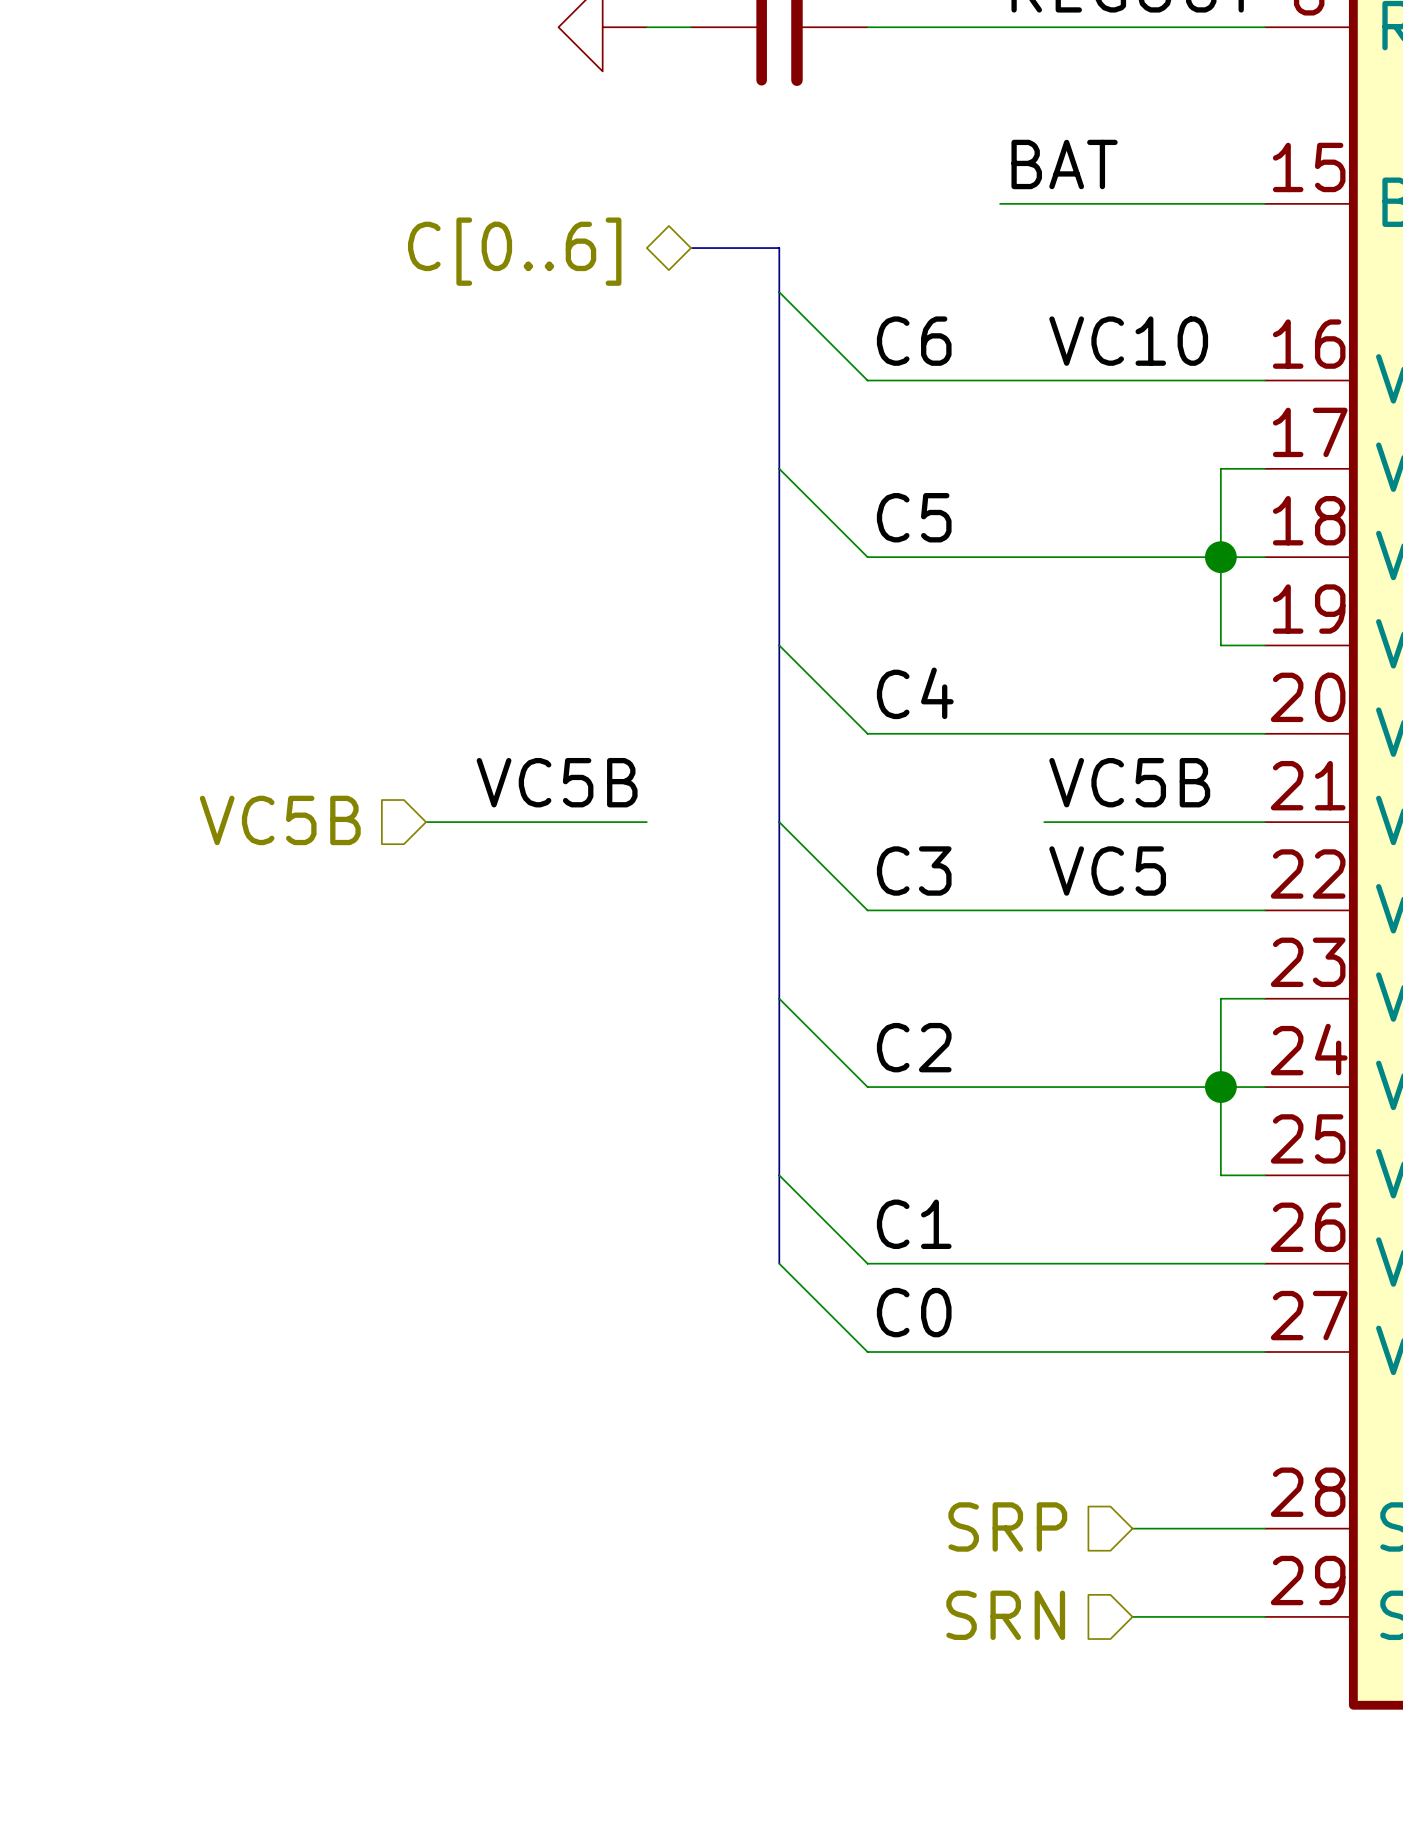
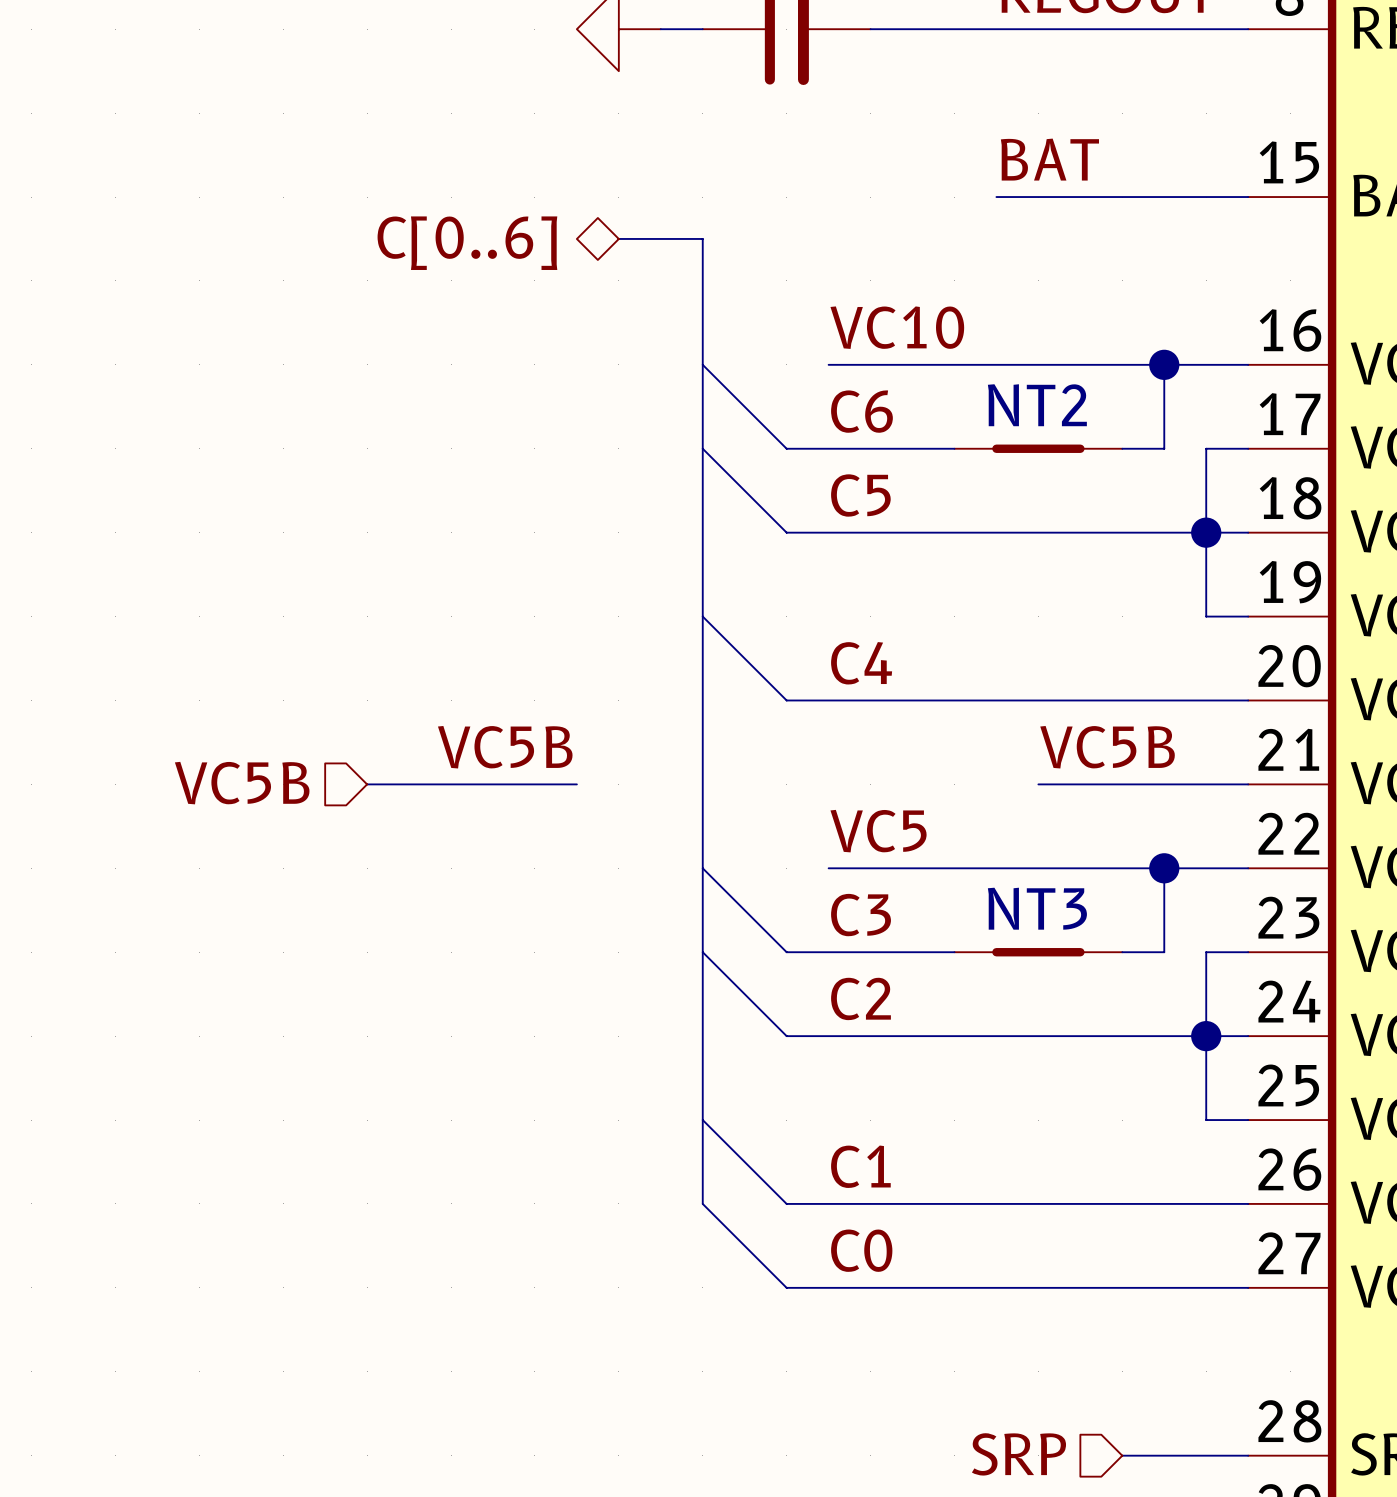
bus: (690, 248) (779, 248) (779, 1263) -> (618, 238) (702, 238) (702, 1203)
hierarchical label position: C[0..6] (514, 251) -> C[0..6] (467, 243)
wire: (779, 292) (867, 380) -> (828, 364) (870, 364)
label position: C6 (914, 341) -> C6 (861, 411)
label position: VC10 (1128, 341) -> VC10 (897, 327)
wire: none -> (702, 364) (786, 448) (954, 448)
wire: none -> (1164, 364) (1164, 448) (1122, 448)
junction: none -> (1164, 364)
wire: (779, 468) (867, 557) -> (702, 448) (786, 532) (870, 532)
NT2: none -> (1038, 448)
label position: C5 (914, 517) -> C5 (860, 495)
wire: (779, 645) (867, 733) -> (702, 616) (786, 700) (870, 700)
label position: C4 (915, 693) -> C4 (861, 663)
label position: VC5B (557, 782) -> VC5B (505, 747)
hierarchical label position: VC5B (280, 820) -> VC5B (242, 783)
wire: (558, 822) (646, 822) -> (367, 784) (451, 784)
wire: (779, 822) (867, 910) -> (828, 868) (870, 868)
label position: C3 (914, 871) -> C3 (861, 915)
label position: VC5 (1107, 871) -> VC5 (878, 831)
wire: none -> (702, 868) (786, 952) (954, 952)
wire: none -> (1164, 868) (1164, 952) (1122, 952)
junction: none -> (1164, 868)
wire: (779, 998) (867, 1087) -> (702, 952) (786, 1036) (870, 1036)
NT3: none -> (1038, 952)
label position: C2 (914, 1047) -> C2 (860, 998)
wire: (779, 1175) (867, 1263) -> (702, 1120) (786, 1203) (870, 1203)
label position: C1 (914, 1224) -> C1 (860, 1166)
wire: (779, 1263) (867, 1351) -> (702, 1203) (786, 1287) (870, 1287)
label position: C0 (914, 1312) -> C0 (861, 1250)

